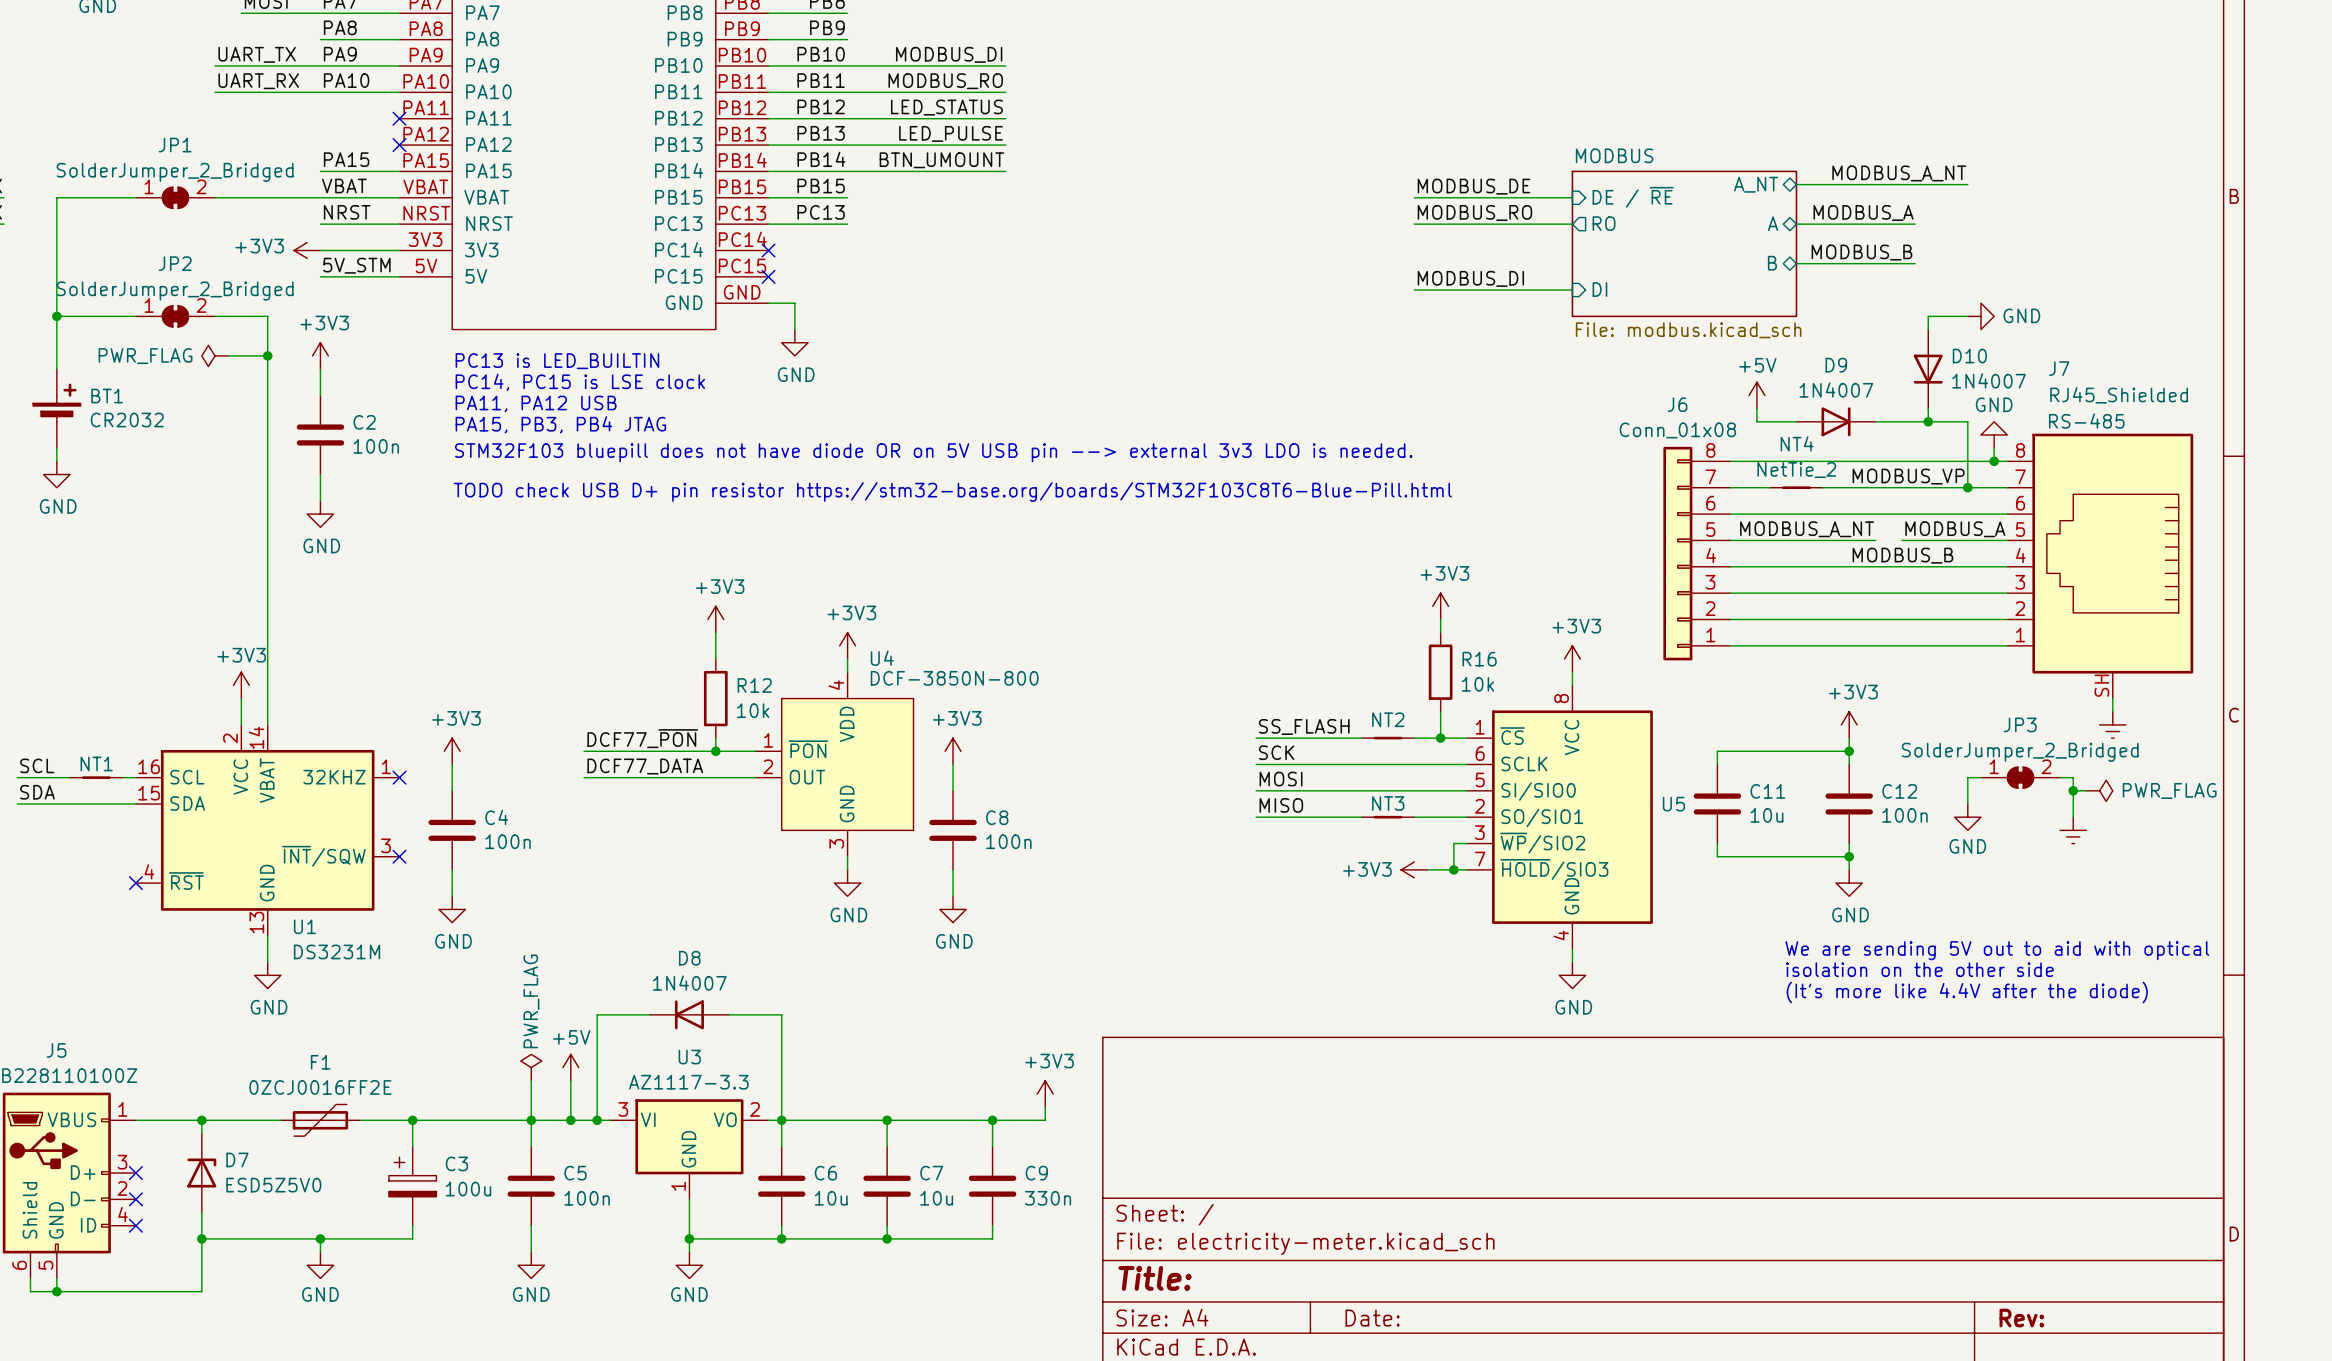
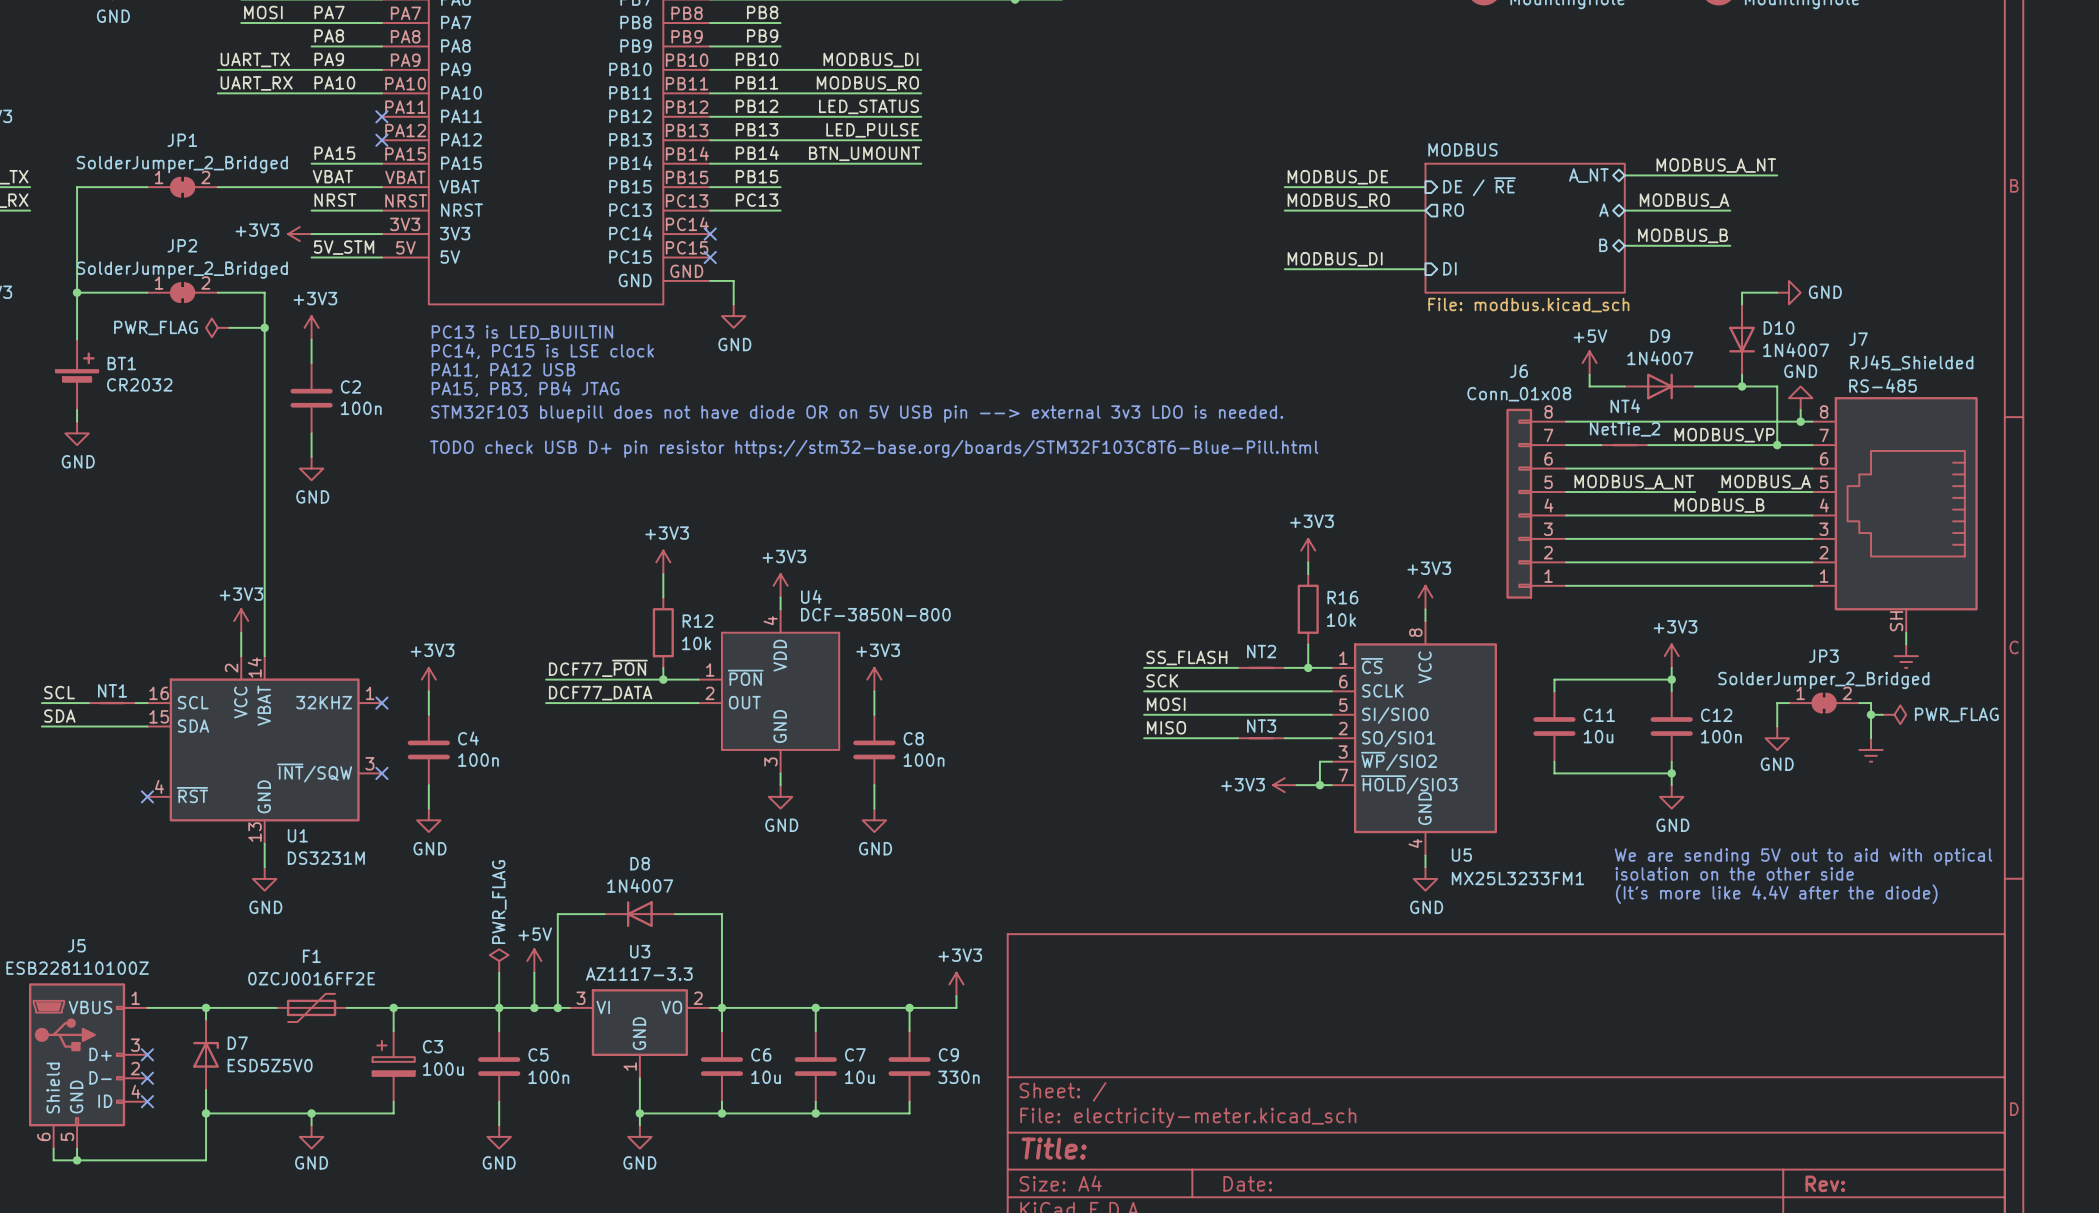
U5 name position: U5 (1673, 804) -> U5 (1461, 855)
U5 value: none -> MX25L3233FM1 (1517, 878)

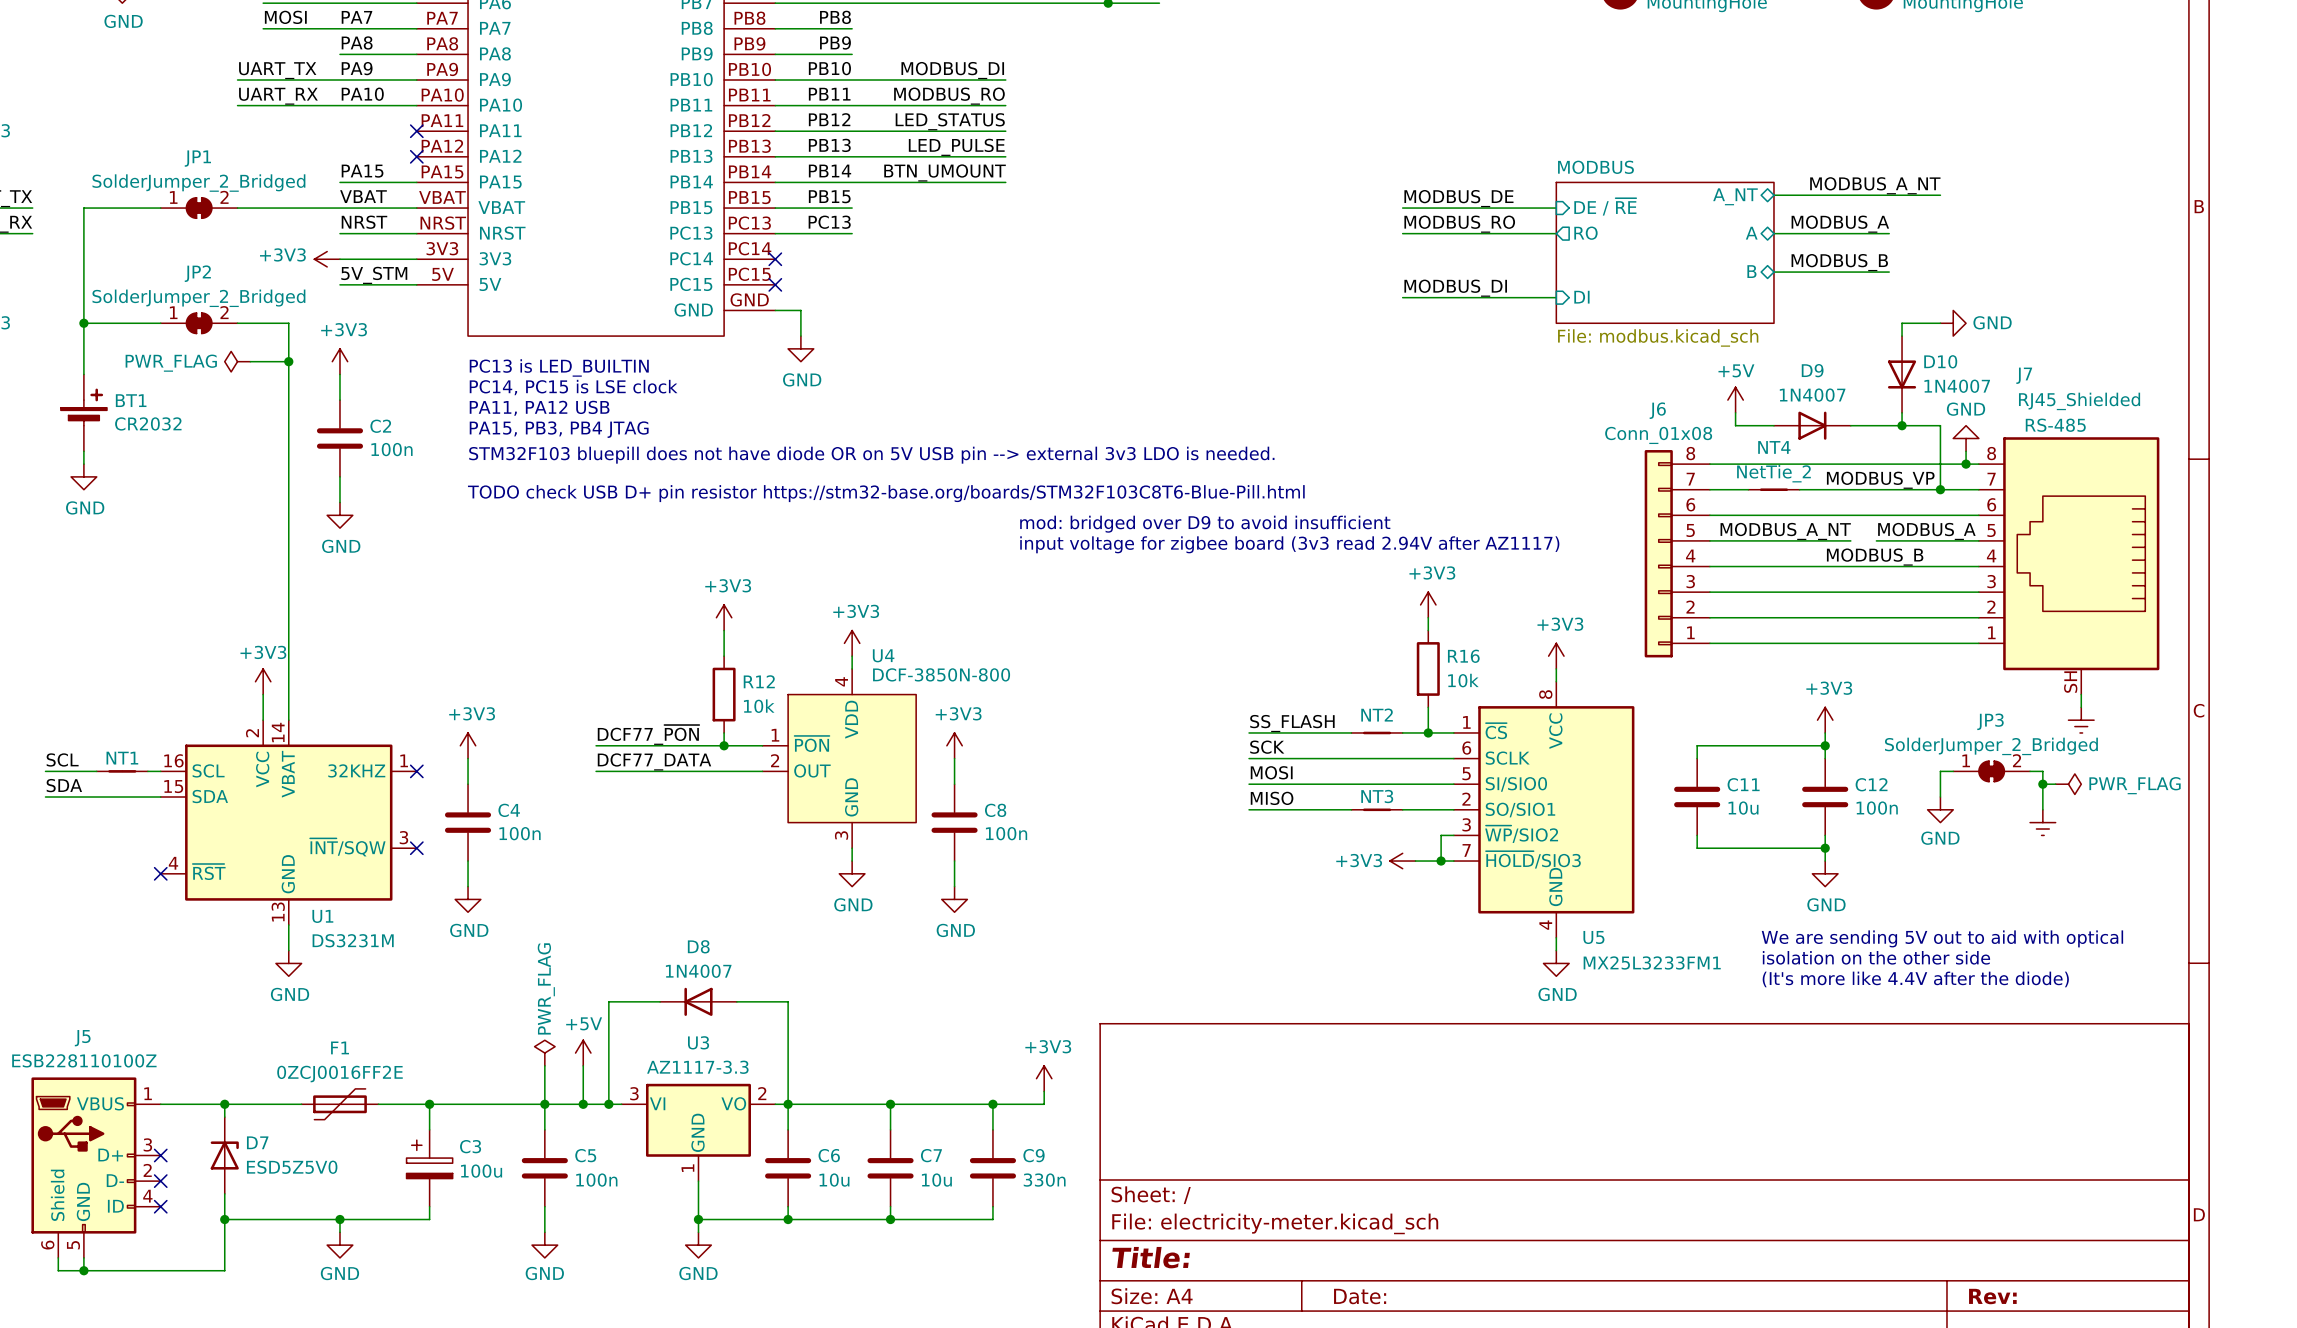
text: none -> mod: bridged over D9 to avoid insufficient (1205, 524)
text: none -> input voltage for zigbee board (3v3 read 2.94V after AZ1117) (1289, 544)

